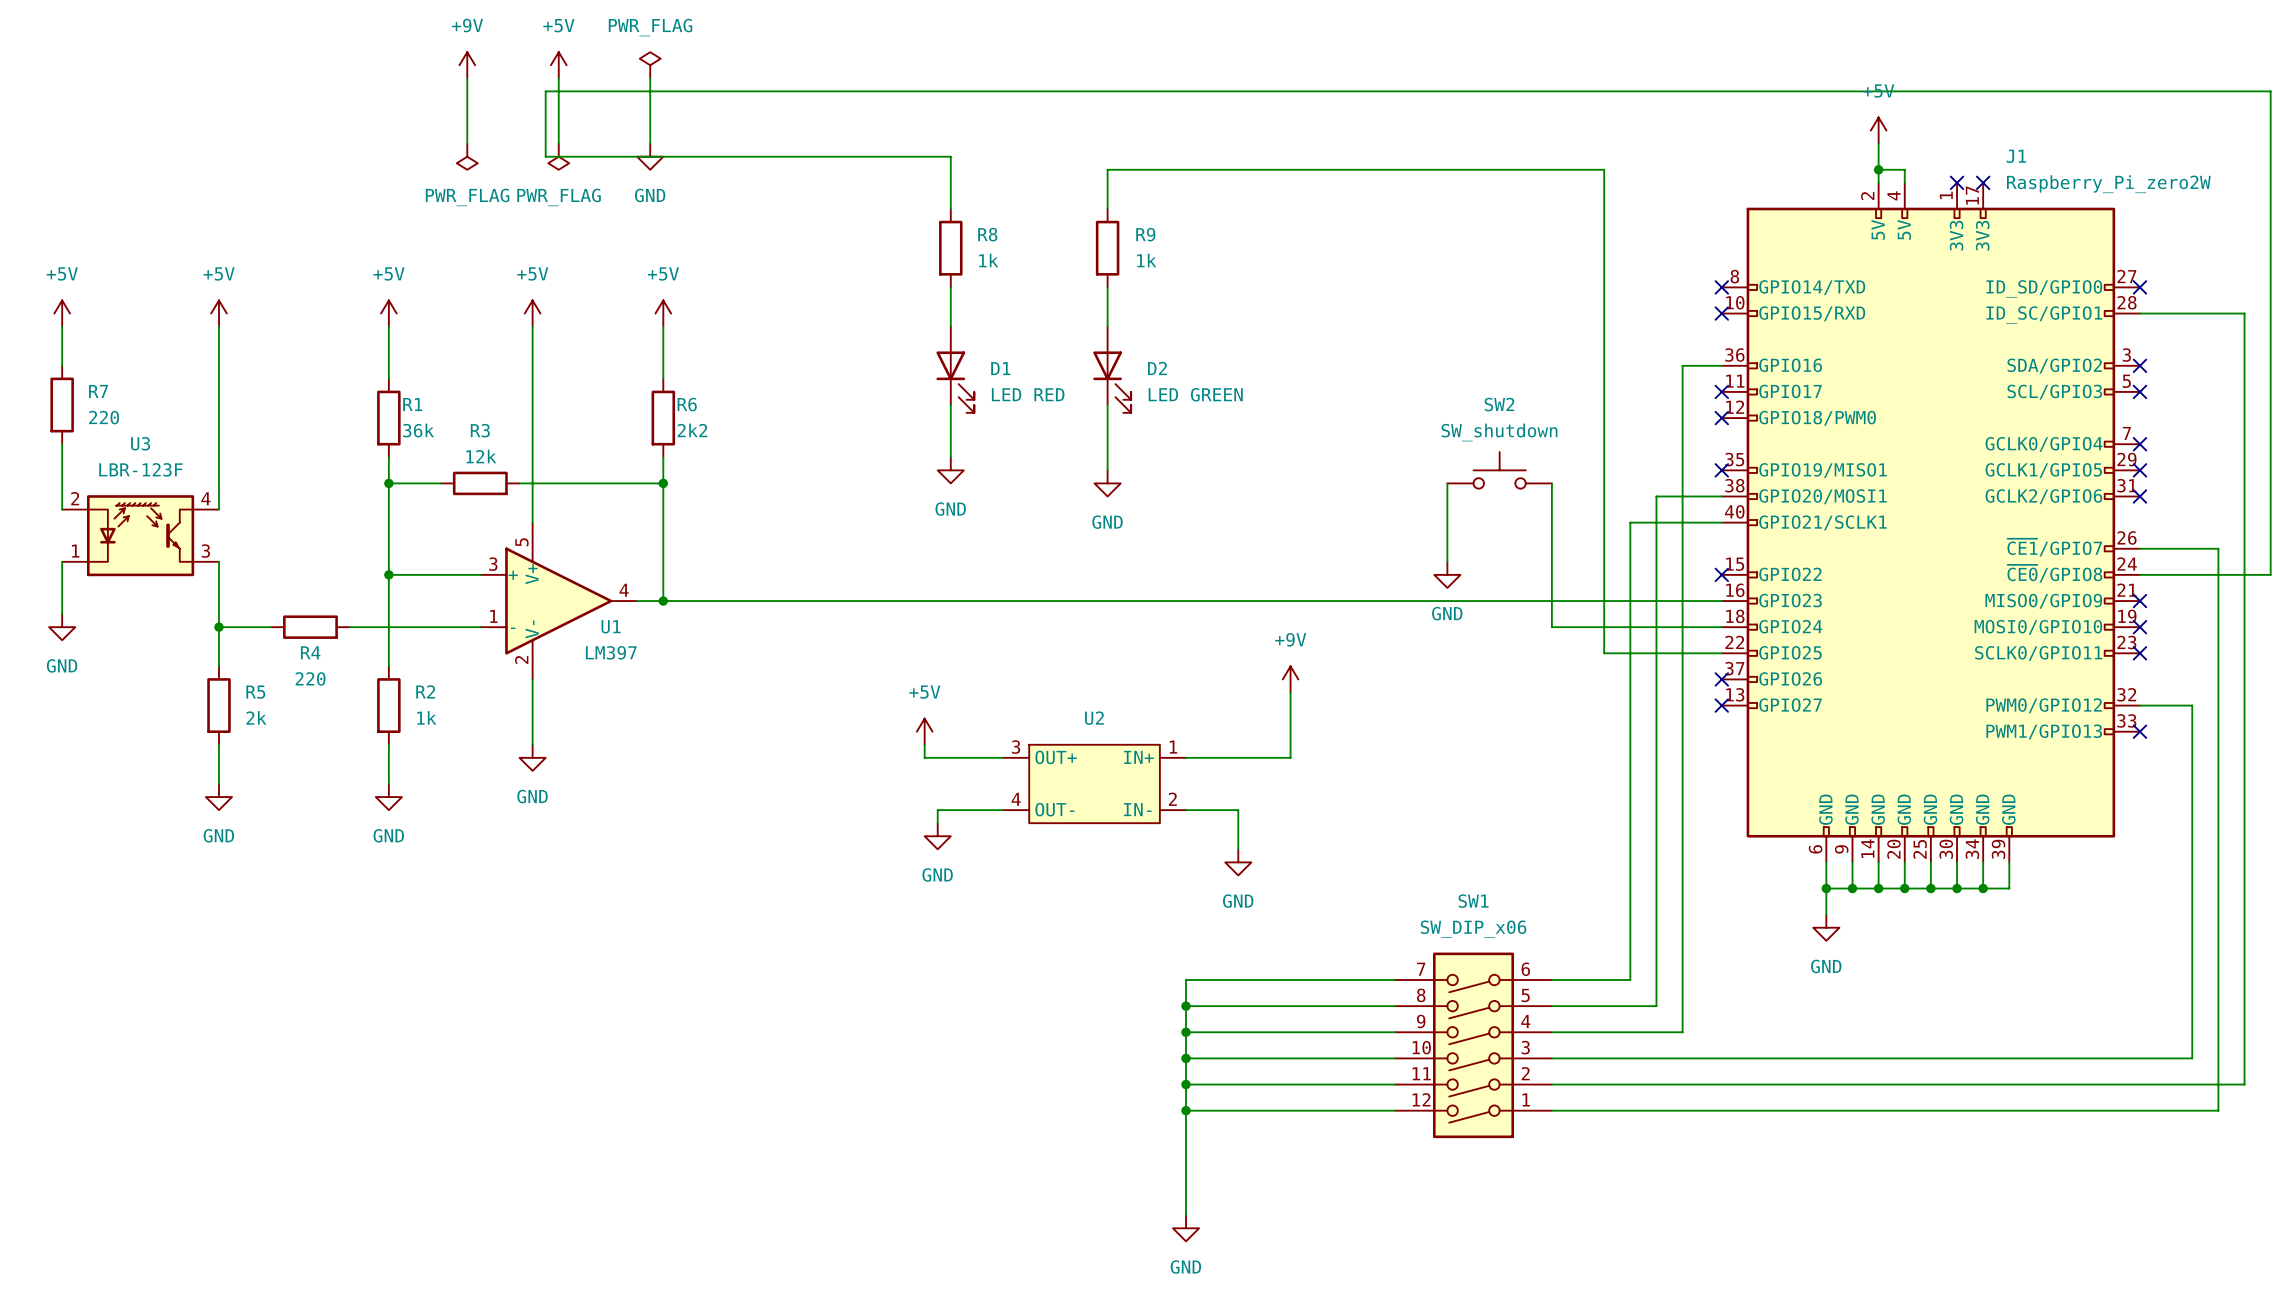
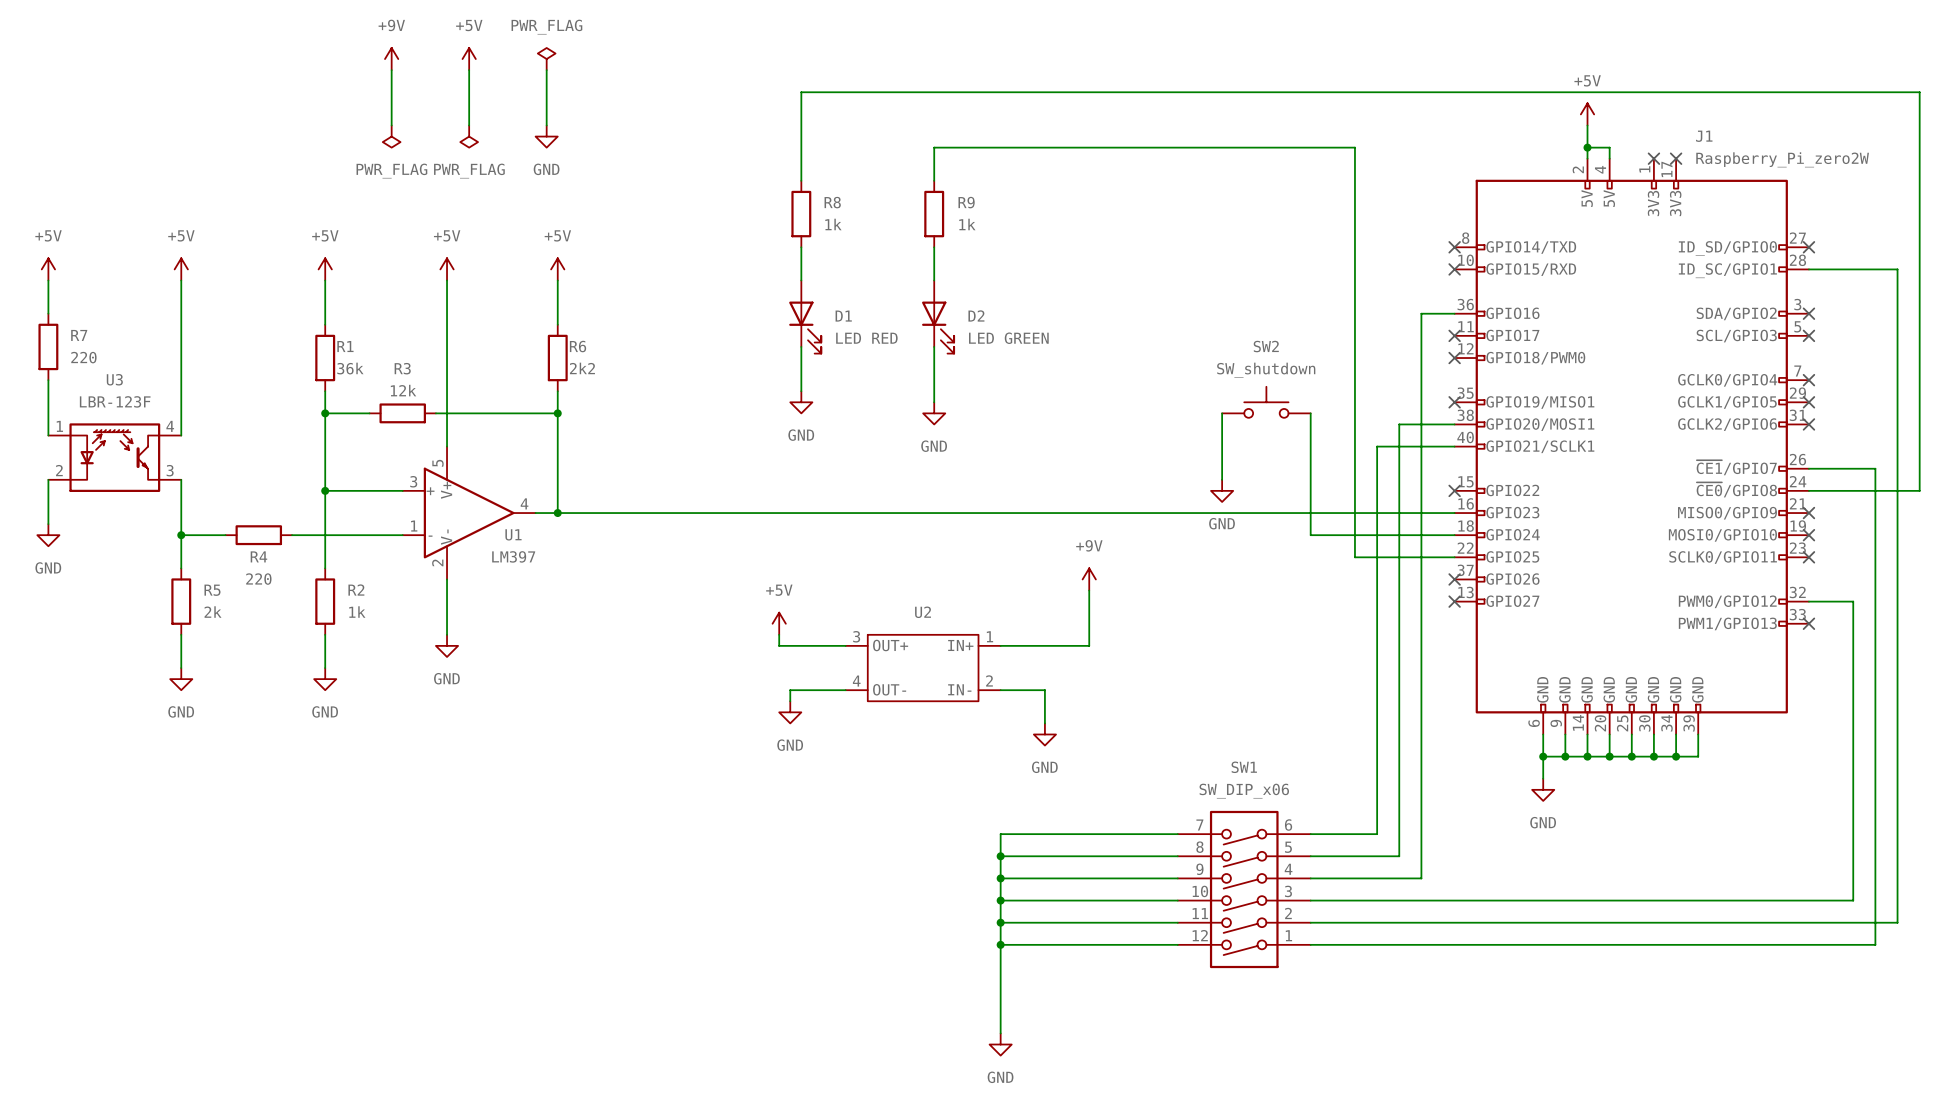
wire: (2270, 104) (2270, 91) (545, 91) (545, 156) (950, 156) -> (1919, 92) (801, 92) (801, 136)
U3 pin number: 2 (75, 498) -> 1 (59, 426)
U3 pin number: 1 (75, 551) -> 2 (59, 470)

